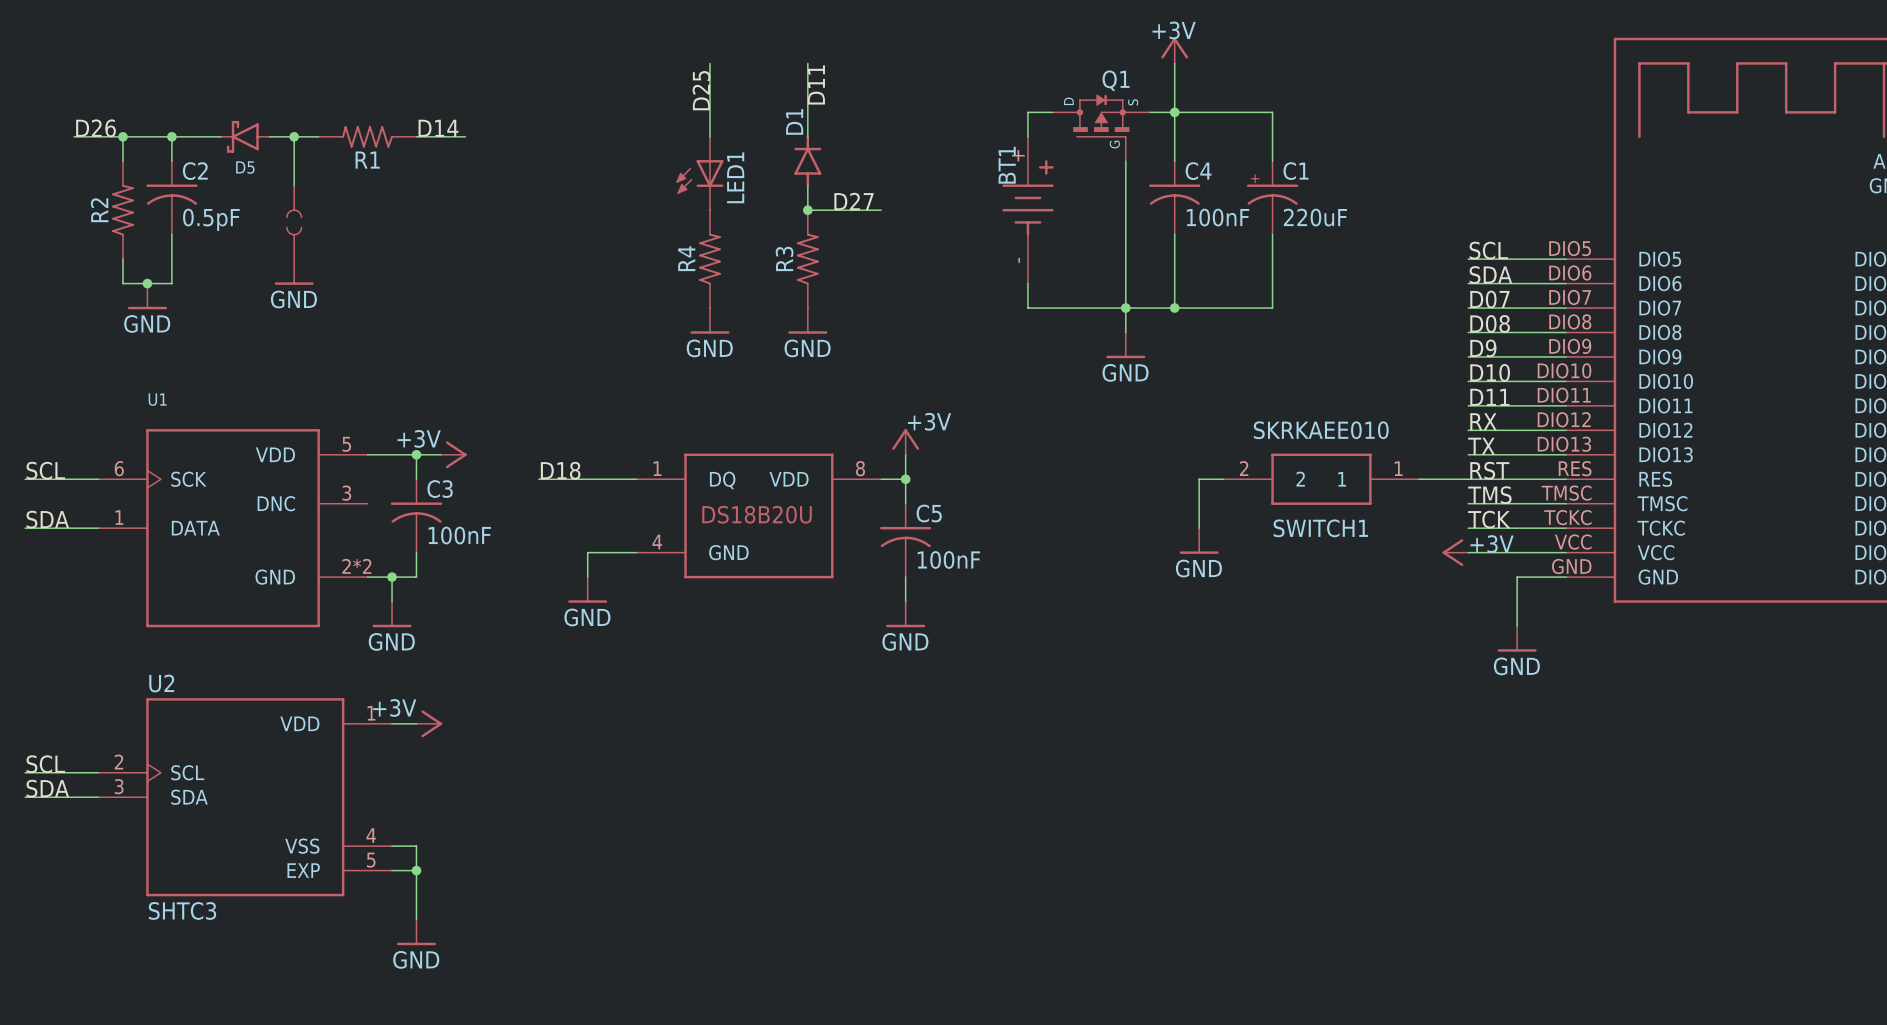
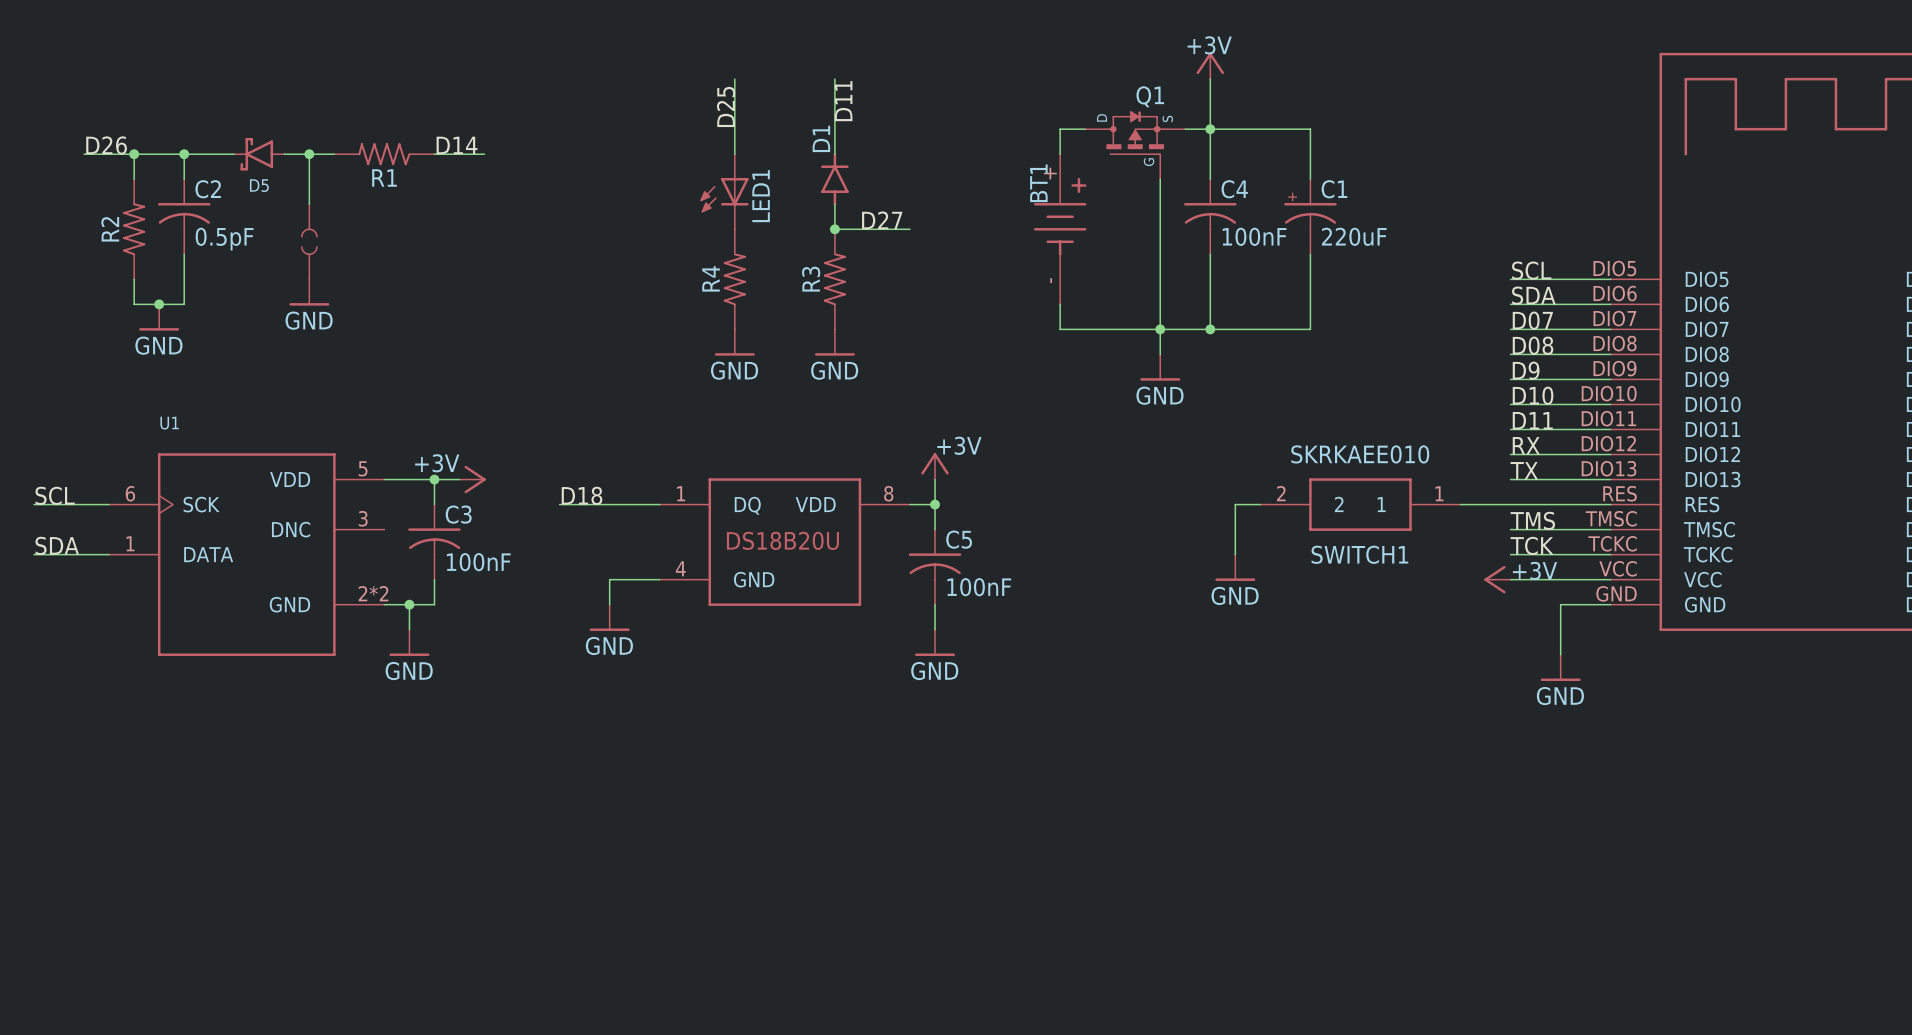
label: RST (1489, 470) -> none
wire: (392, 723) (416, 723) -> none
power symbol: +3V (429, 723) -> none
label: SCL (45, 764) -> none
wire: (25, 772) (98, 772) -> none
label: SDA (47, 788) -> none
wire: (25, 797) (98, 797) -> none
U2: SHTC3 (245, 797) -> none
wire: (392, 846) (416, 846) (416, 919) -> none
wire: (392, 870) (416, 870) -> none
junction: (416, 870) -> none
power symbol: GND (416, 932) -> none

